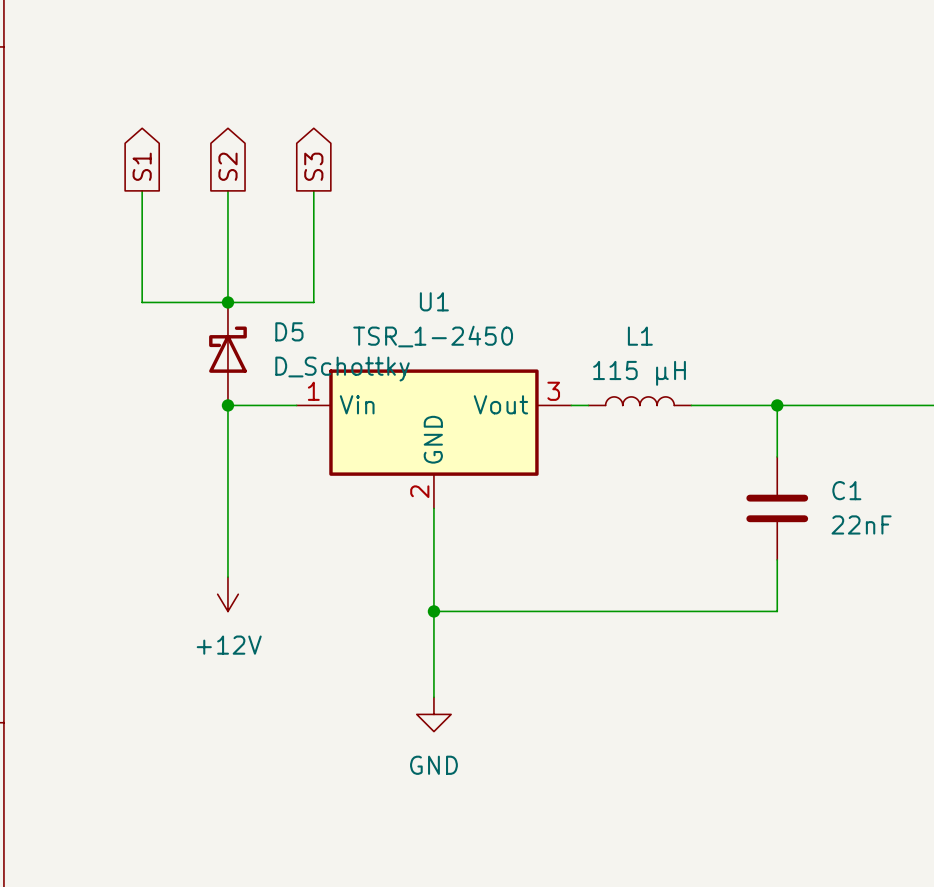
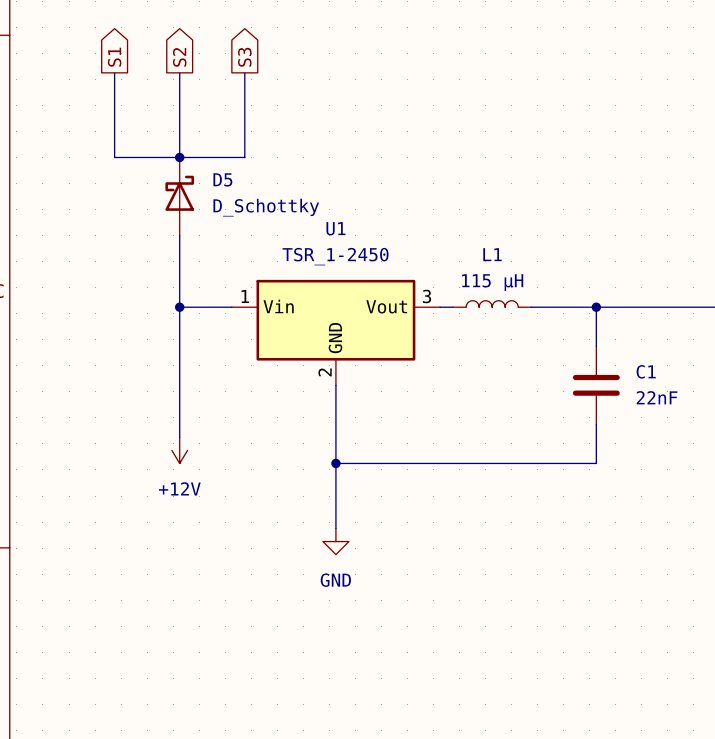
wire: none -> (114, 72) (114, 144)
wire: none -> (179, 72) (179, 144)
wire: none -> (244, 72) (244, 144)
global label position: S1 (142, 166) -> S1 (114, 57)
global label position: S2 (227, 166) -> S2 (179, 57)
global label position: S3 (313, 166) -> S3 (244, 57)
wire: (142, 208) (142, 302) (313, 302) (313, 208) -> (114, 157) (244, 157)
junction: none -> (179, 157)
junction: (227, 302) -> none
D5 position: (227, 353) -> (179, 196)

